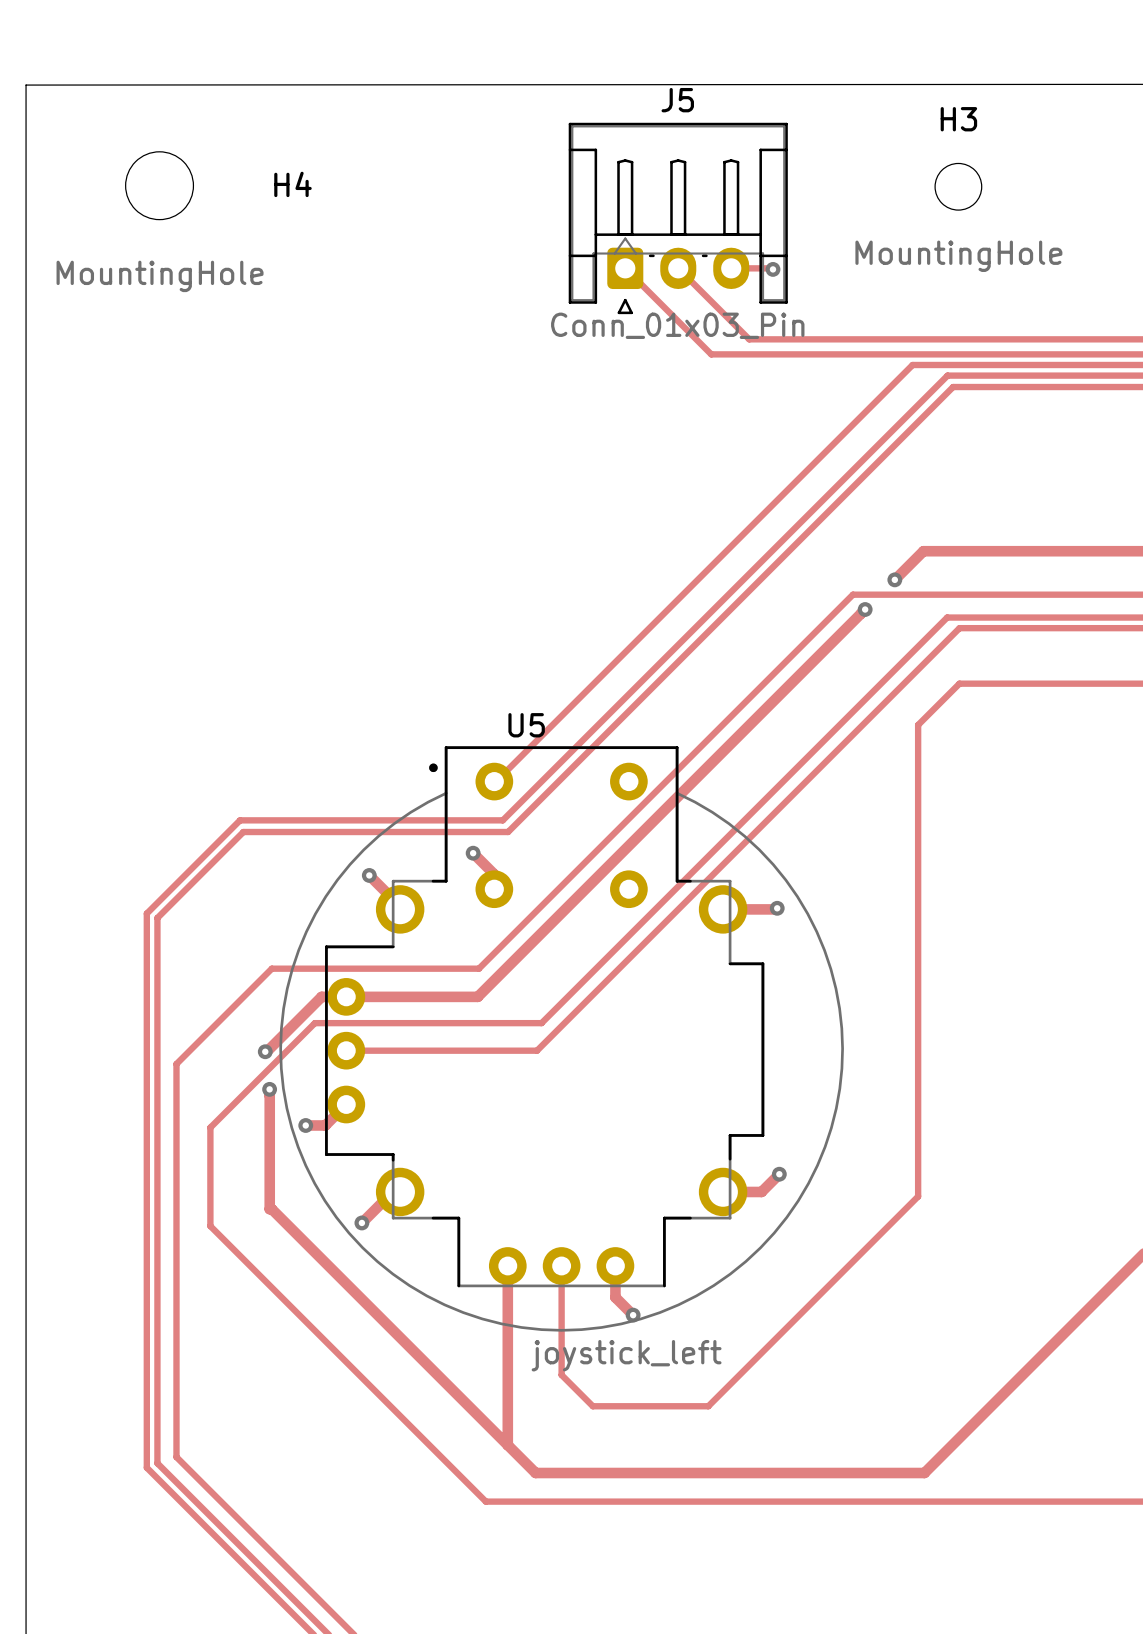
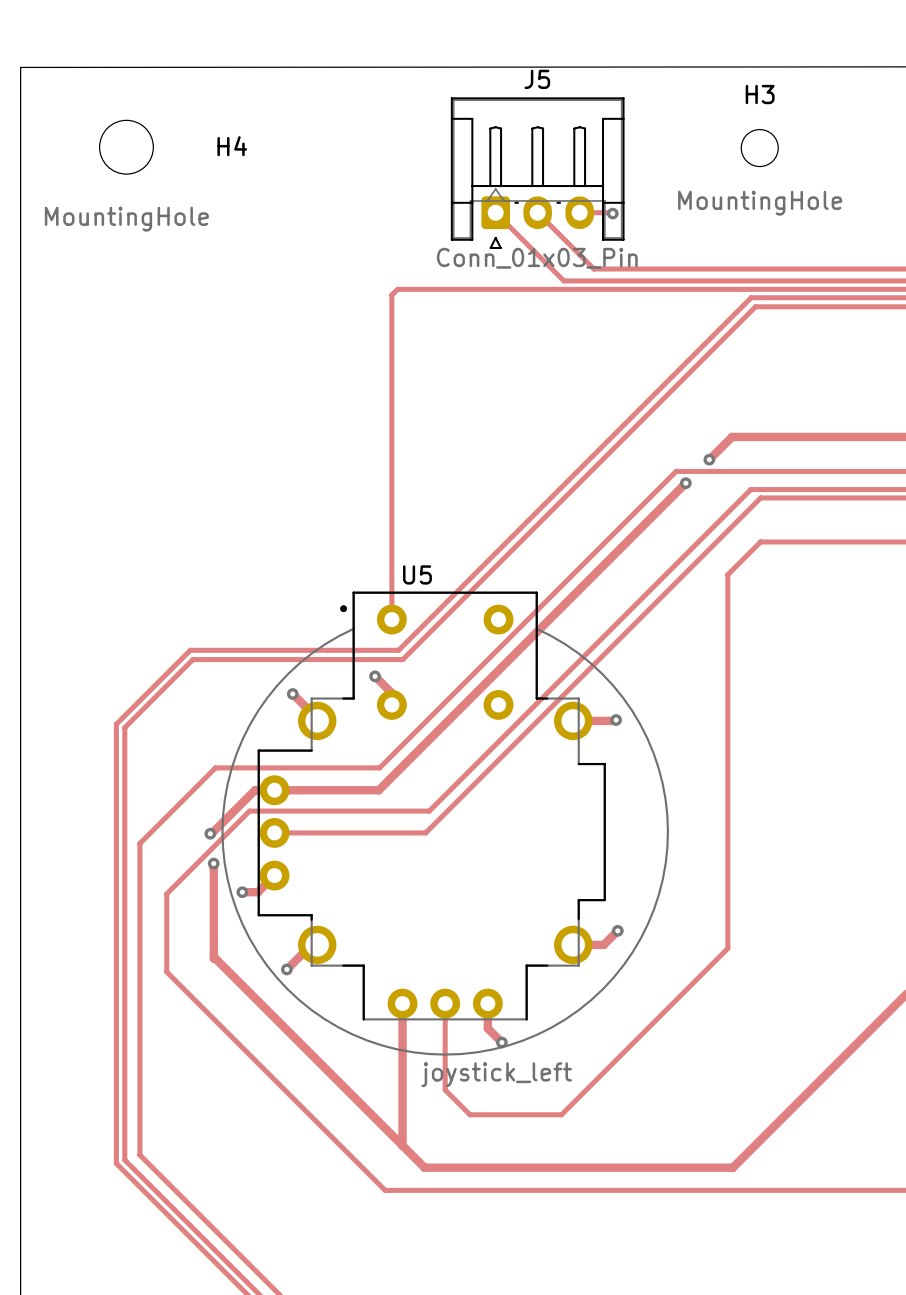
track: (912, 364) (494, 781) -> (723, 289) (397, 289) (391, 295) (391, 619)

